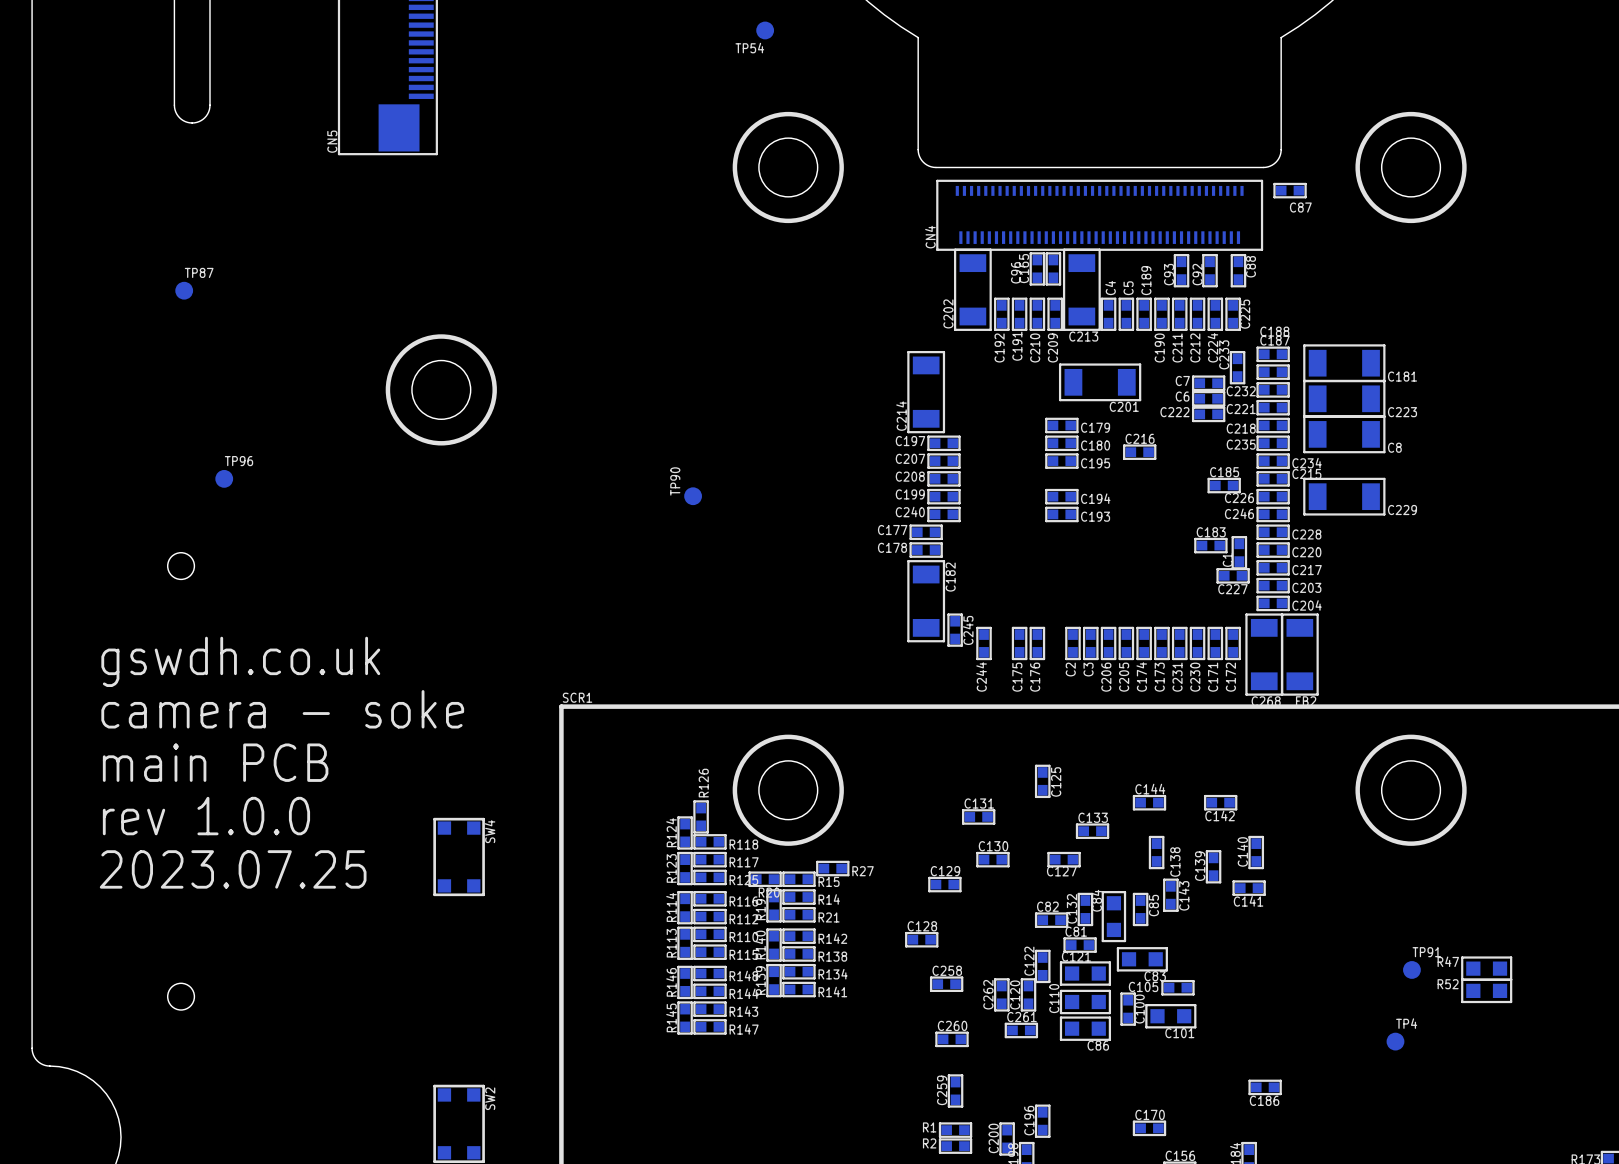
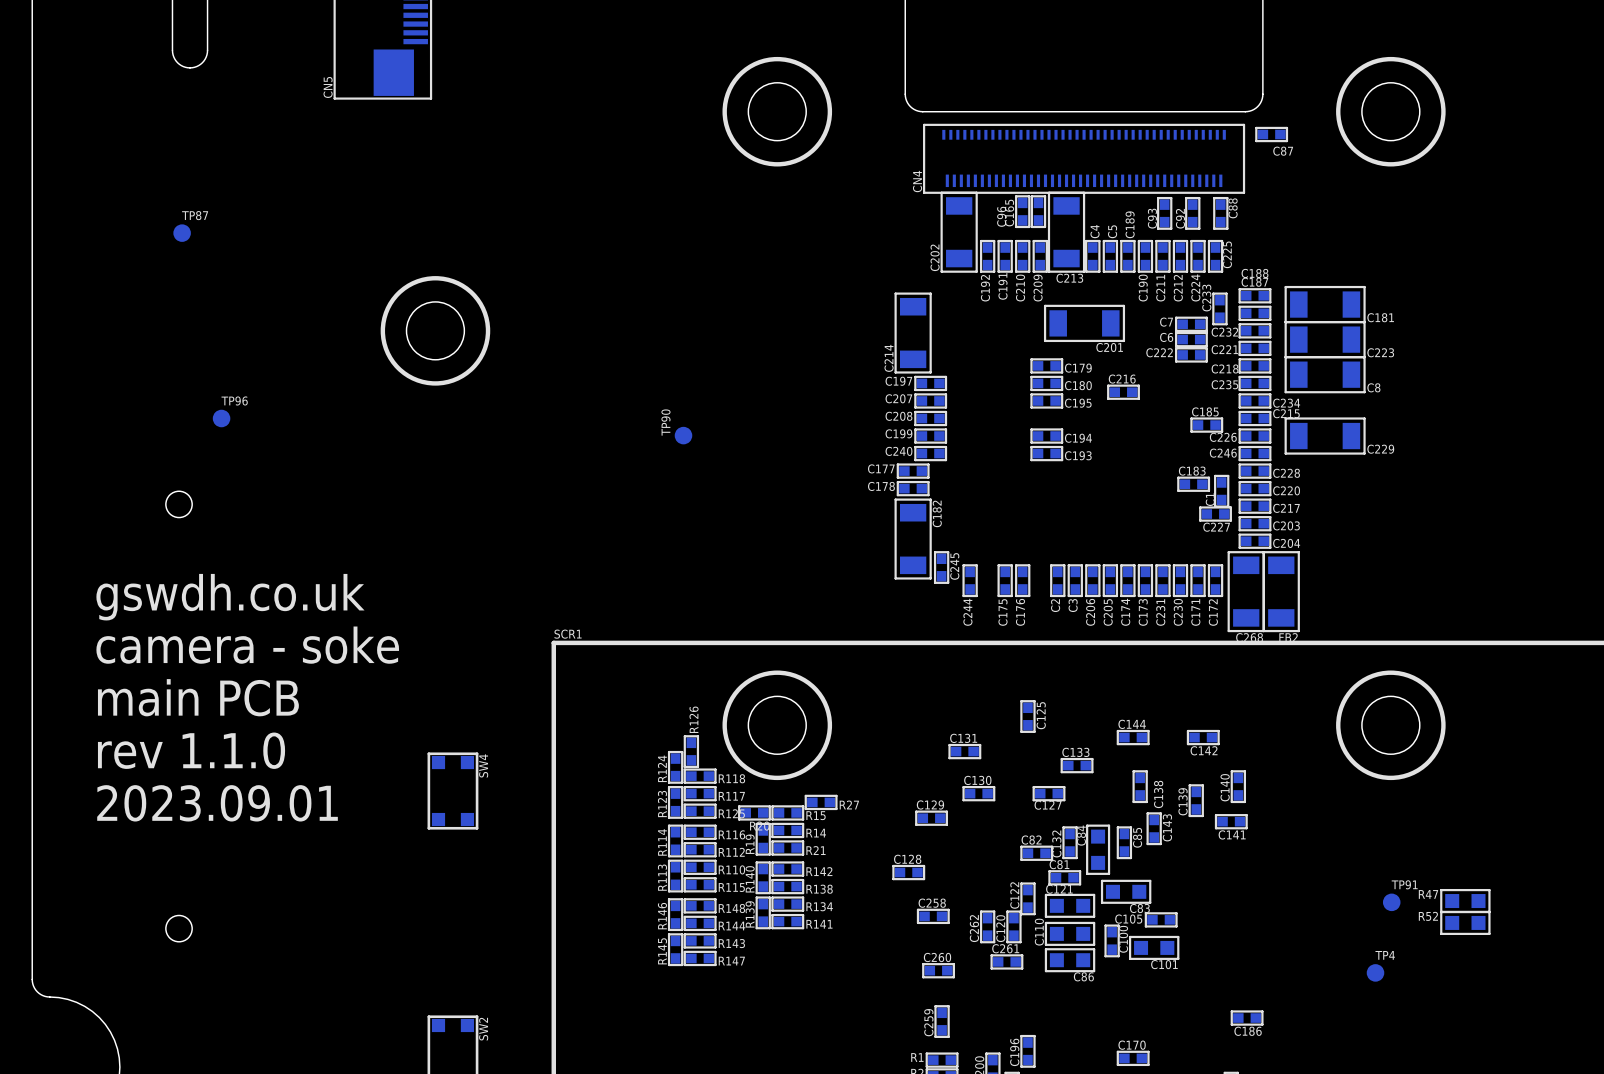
text: rev 1.0.0 (206, 816) -> rev 1.1.0 (191, 750)
text: 2023.07.25 (233, 869) -> 2023.09.01 (217, 803)

